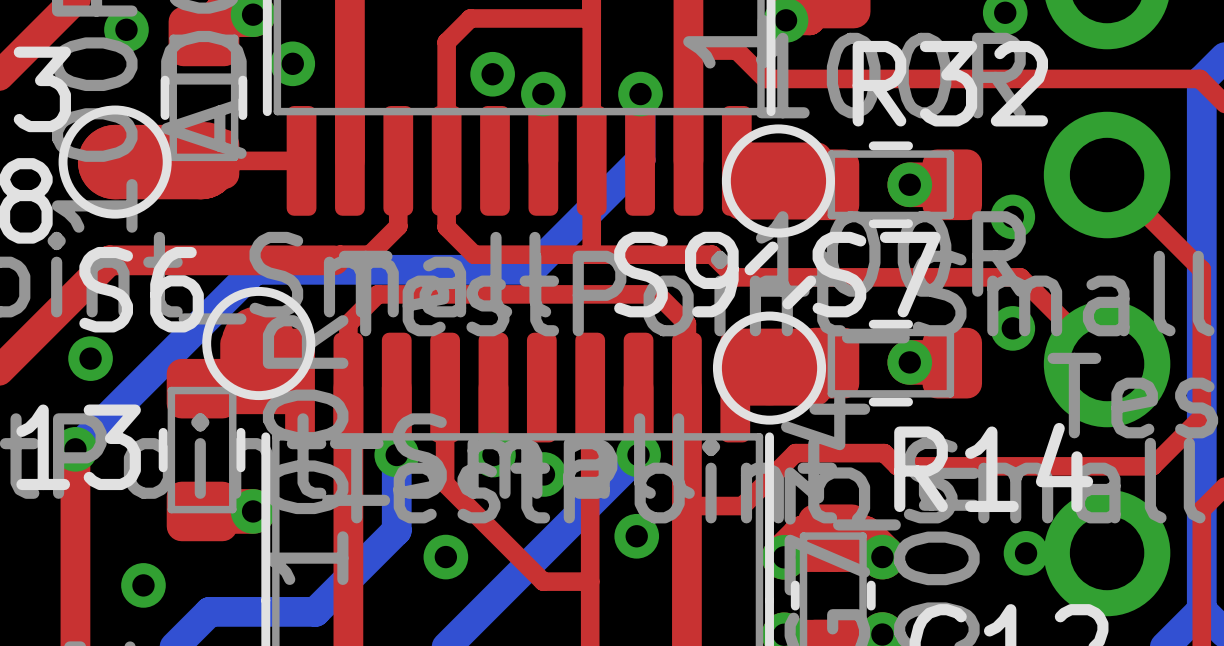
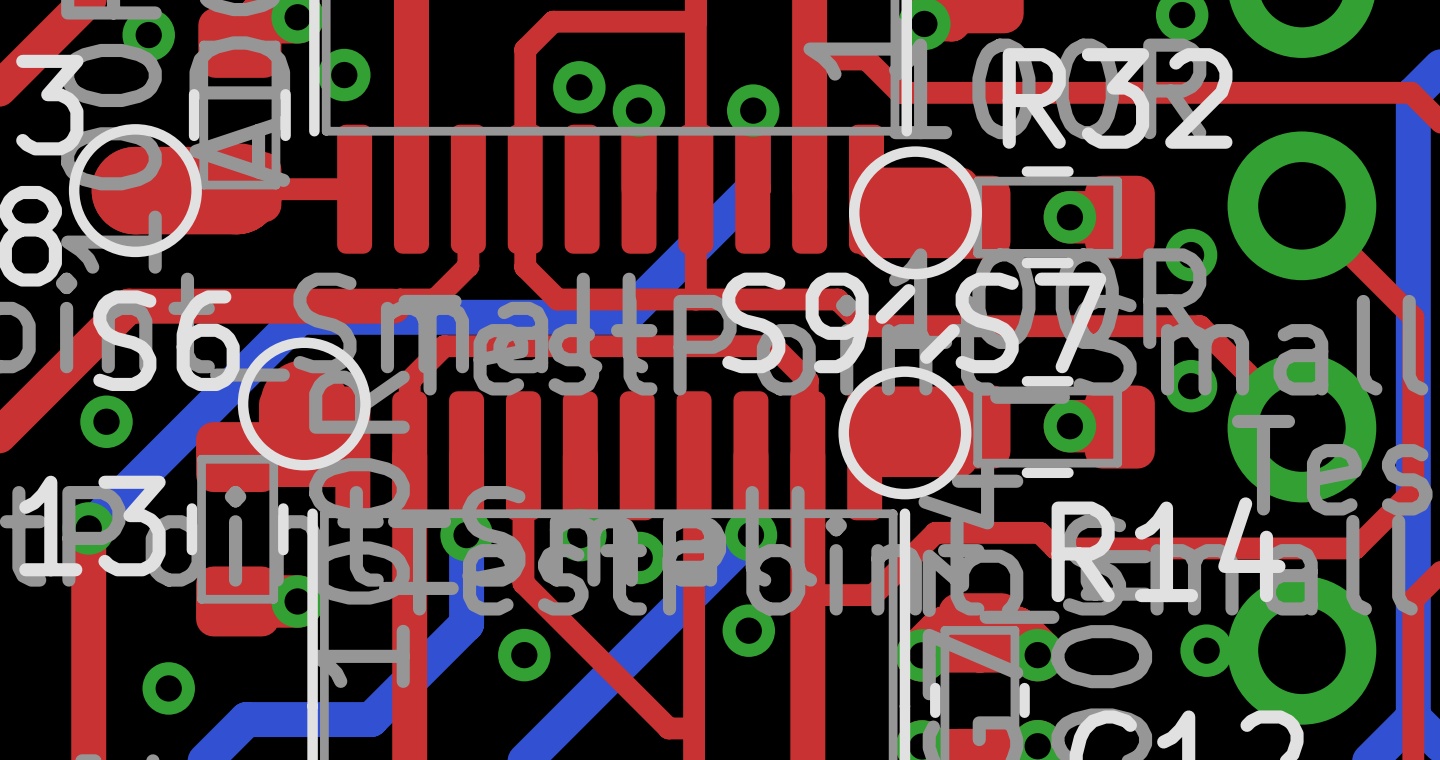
top track: (445, 483) (543, 581) (590, 581) -> (523, 568) (523, 583) (668, 728) (694, 728)

